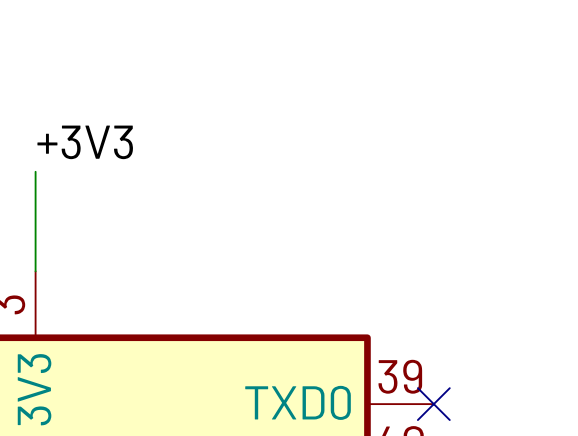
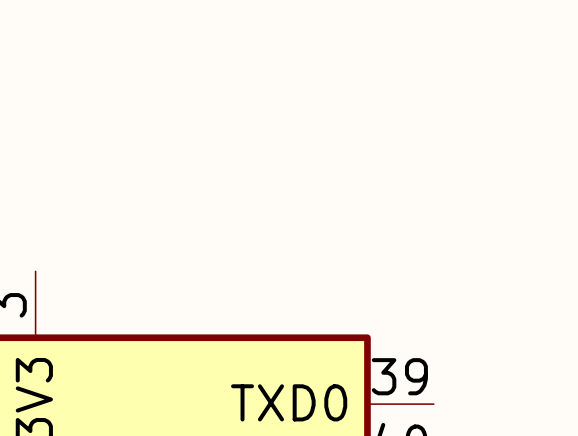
label: +3V3 (85, 142) -> none
wire: (35, 171) (35, 271) -> none
no-connect mark: (433, 404) -> none

